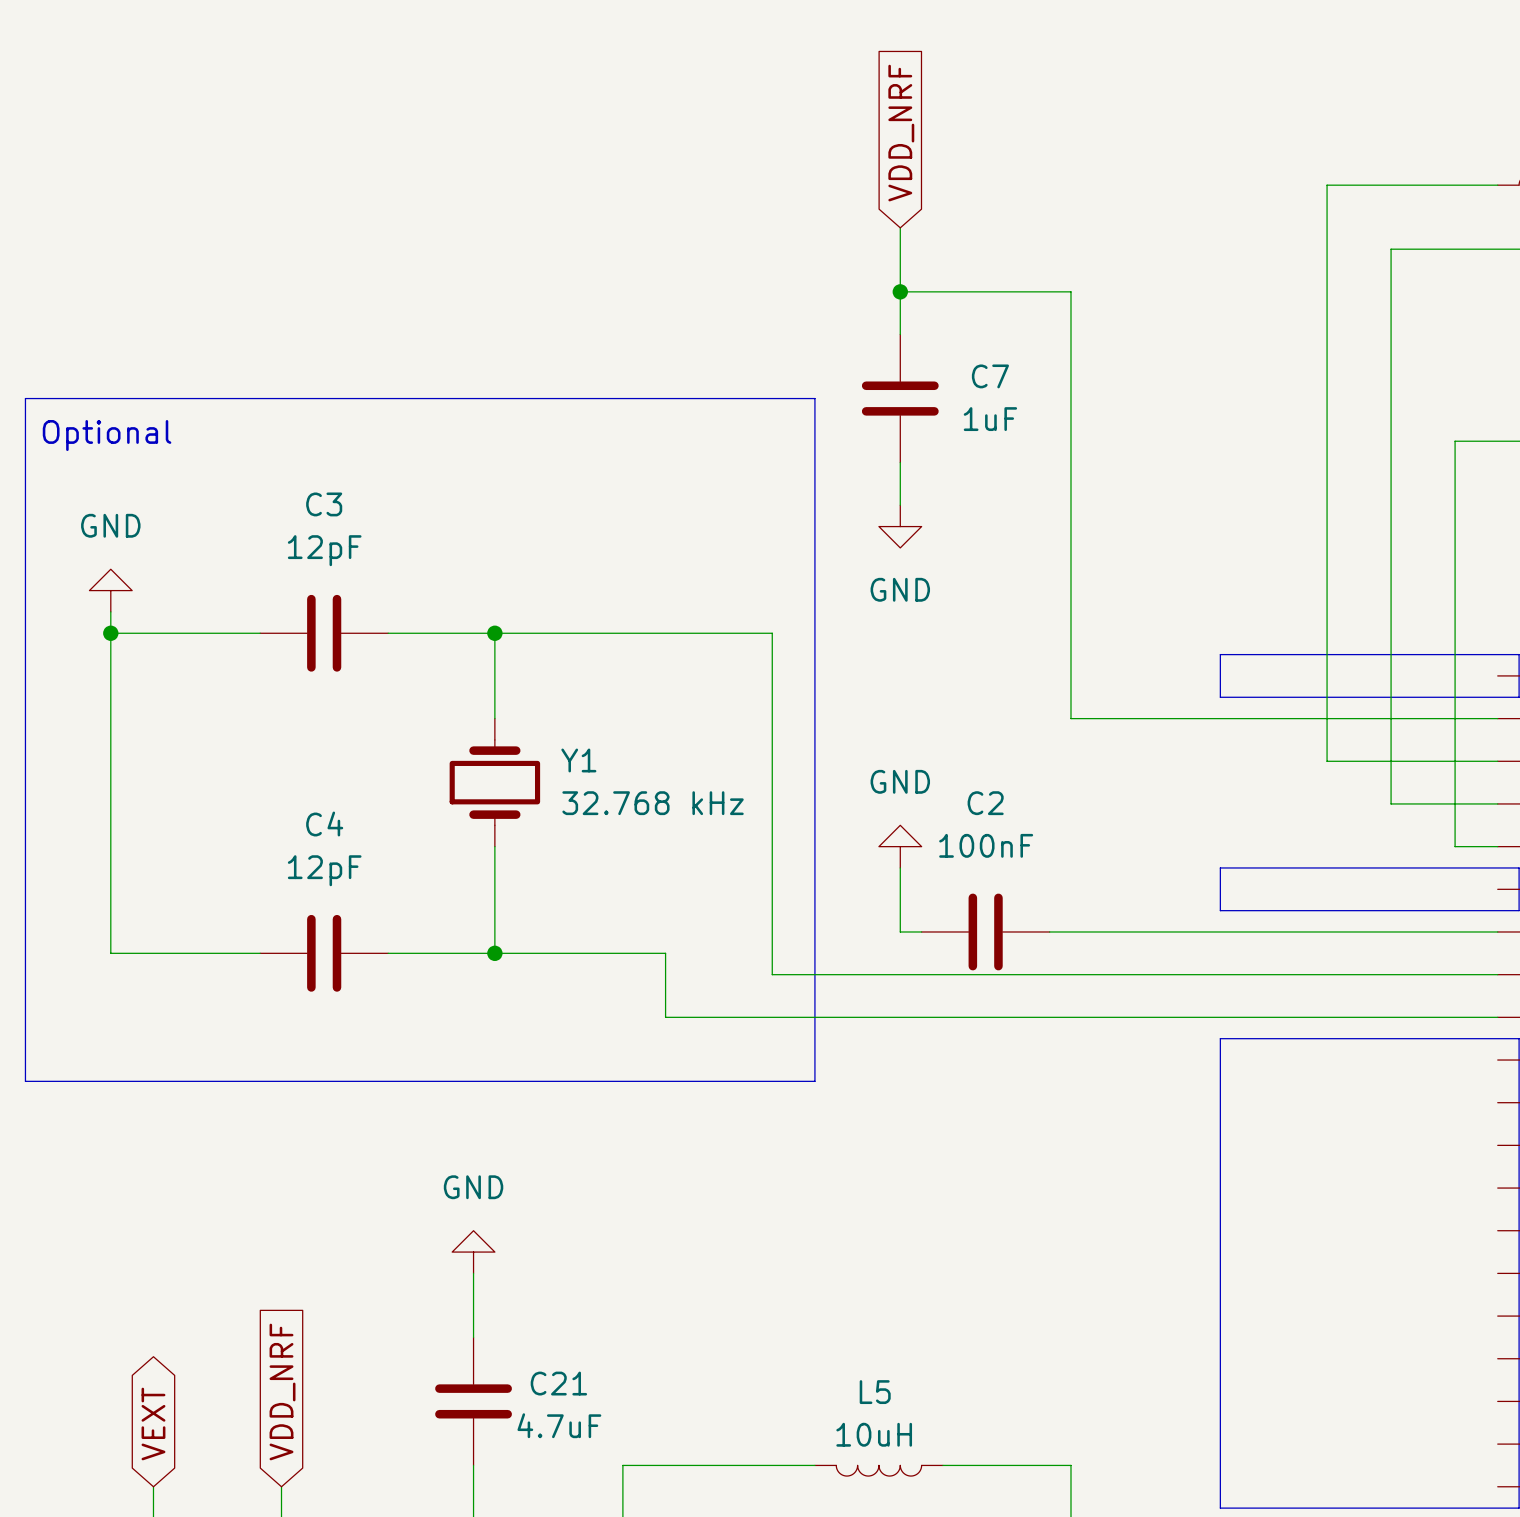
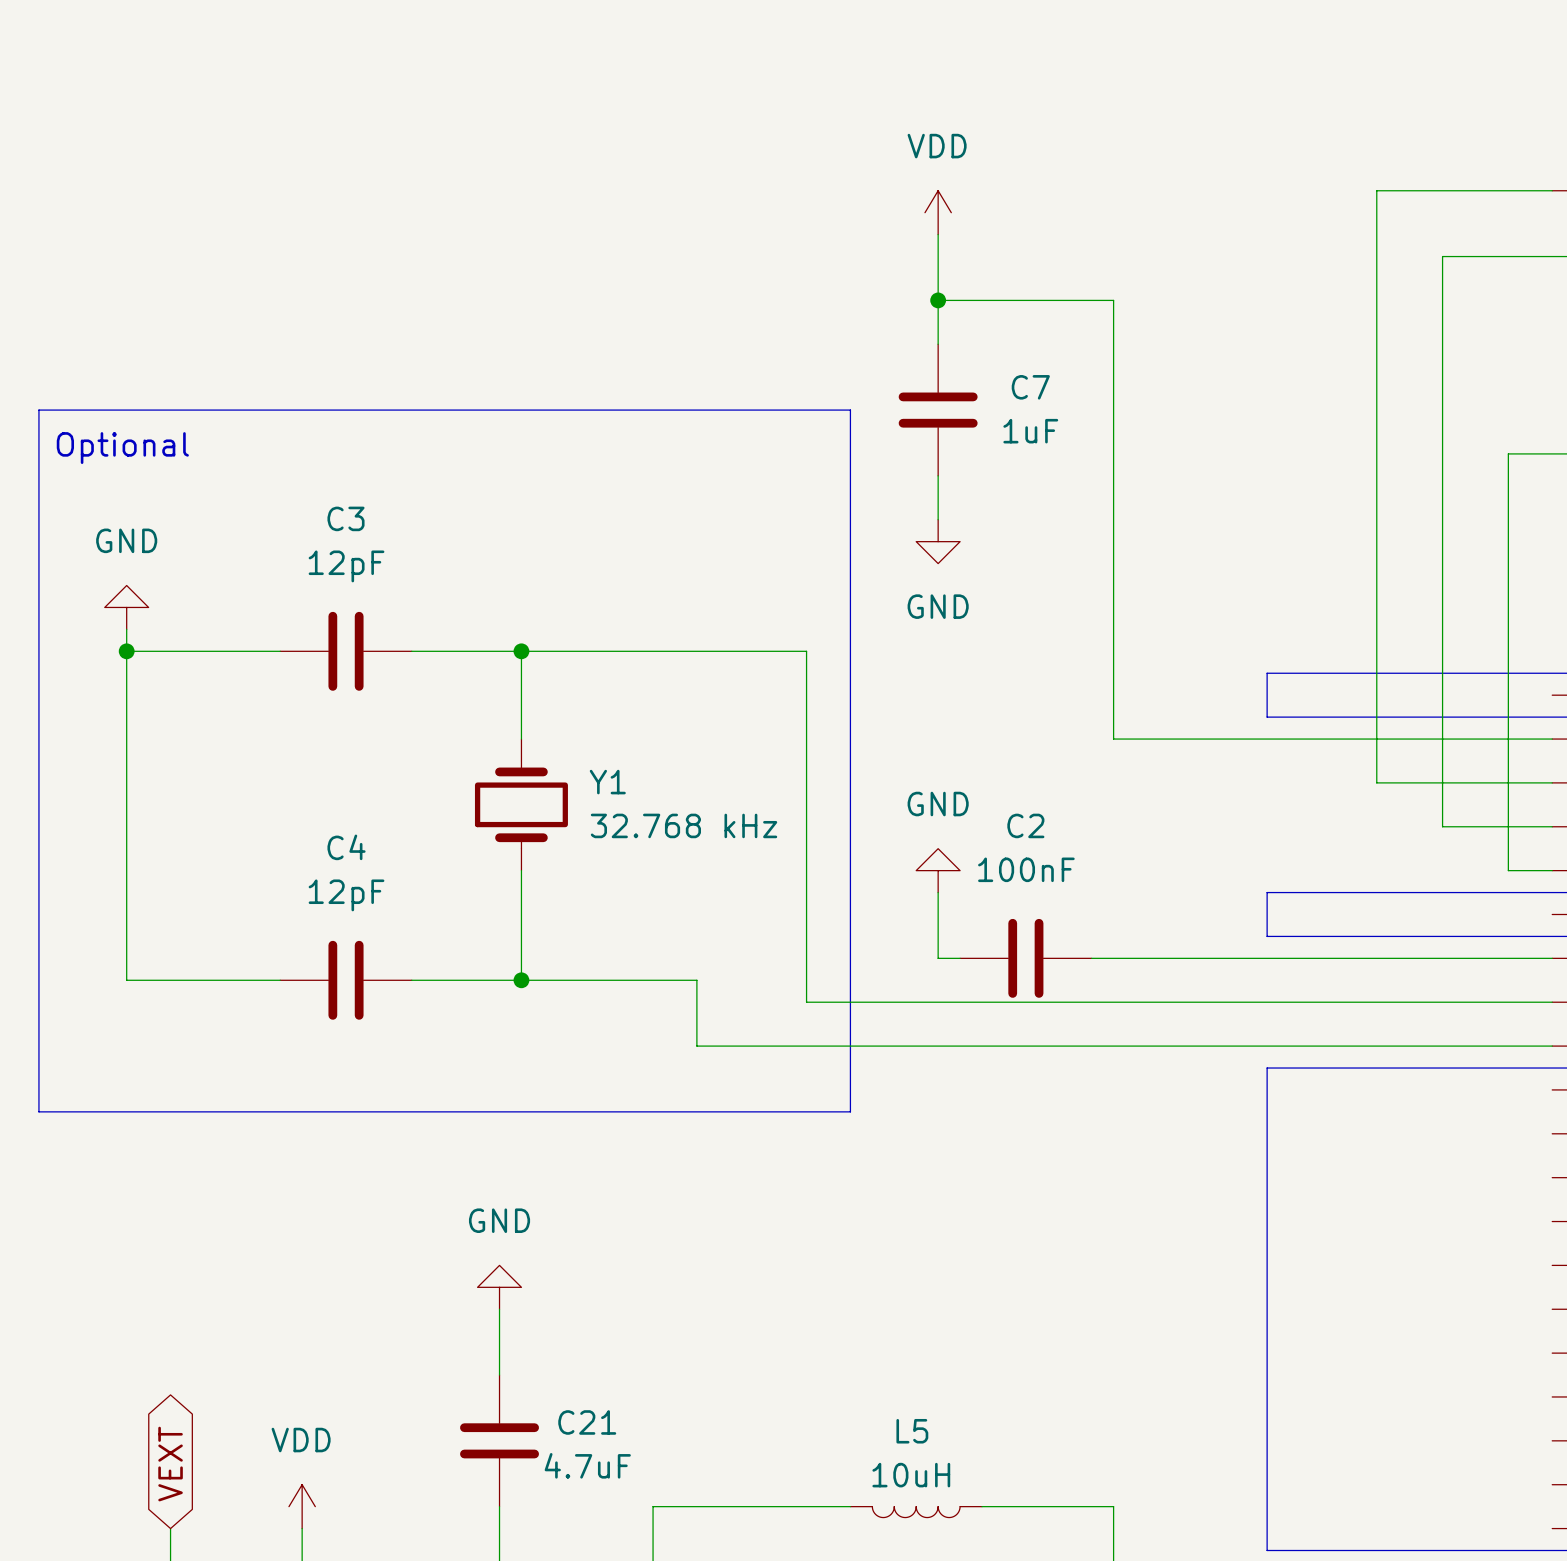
global label: VDD_NRF (901, 133) -> none
power symbol: none -> VDD (938, 212)
global label: VDD_NRF (282, 1391) -> none
power symbol: none -> VDD (302, 1506)

